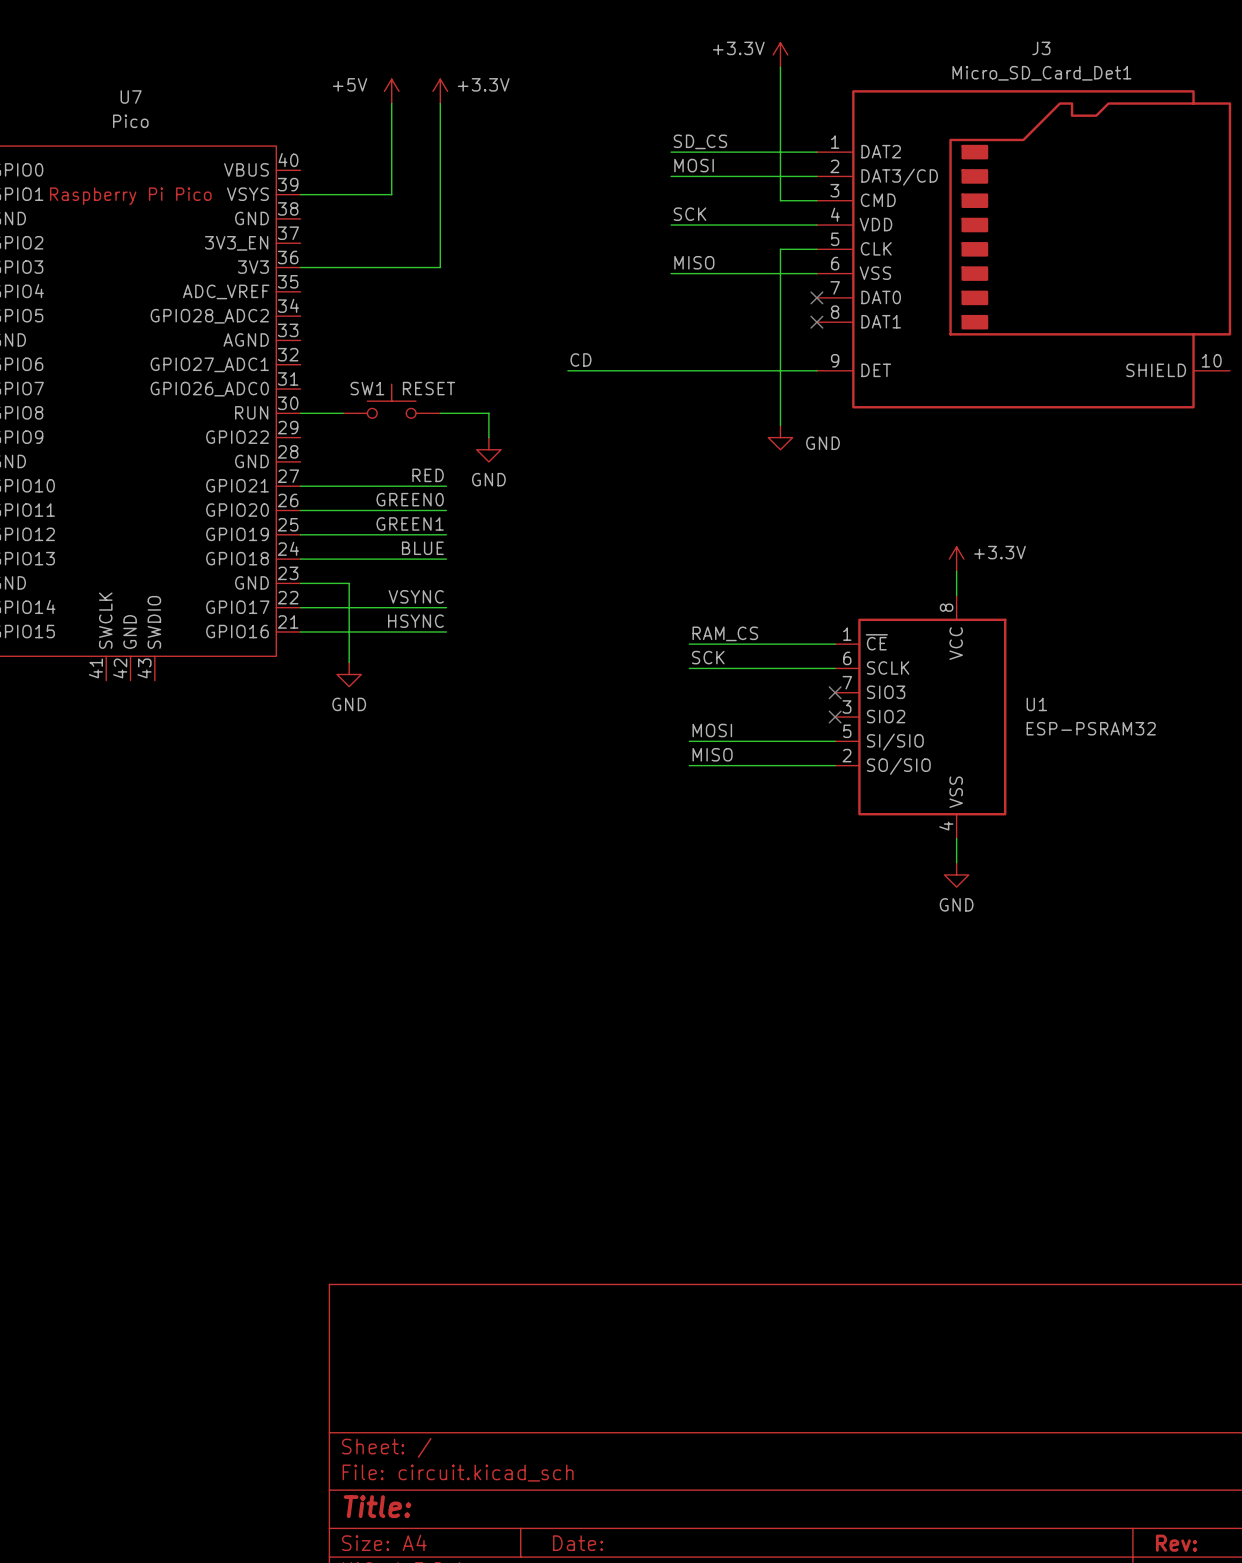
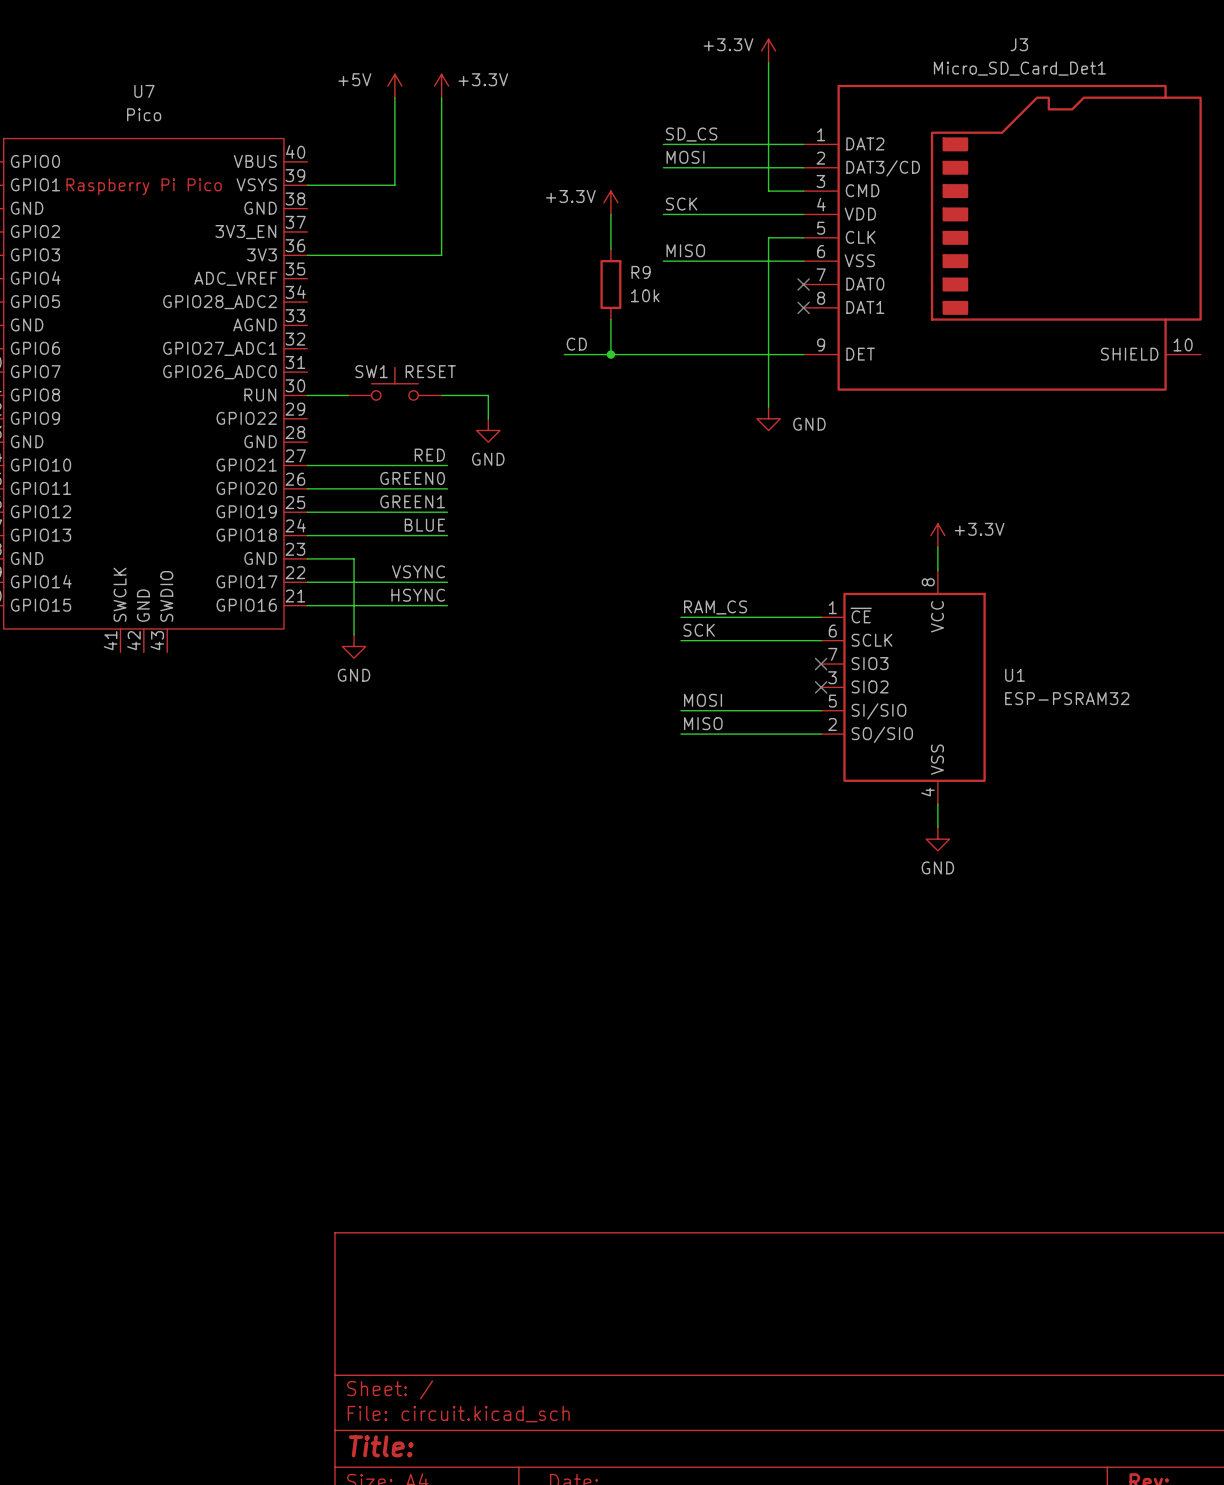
power symbol: none -> +3.3V (610, 202)
wire: none -> (610, 214) (610, 249)
R9: none -> 10k (610, 284)
wire: none -> (610, 319) (610, 354)
junction: none -> (610, 354)

